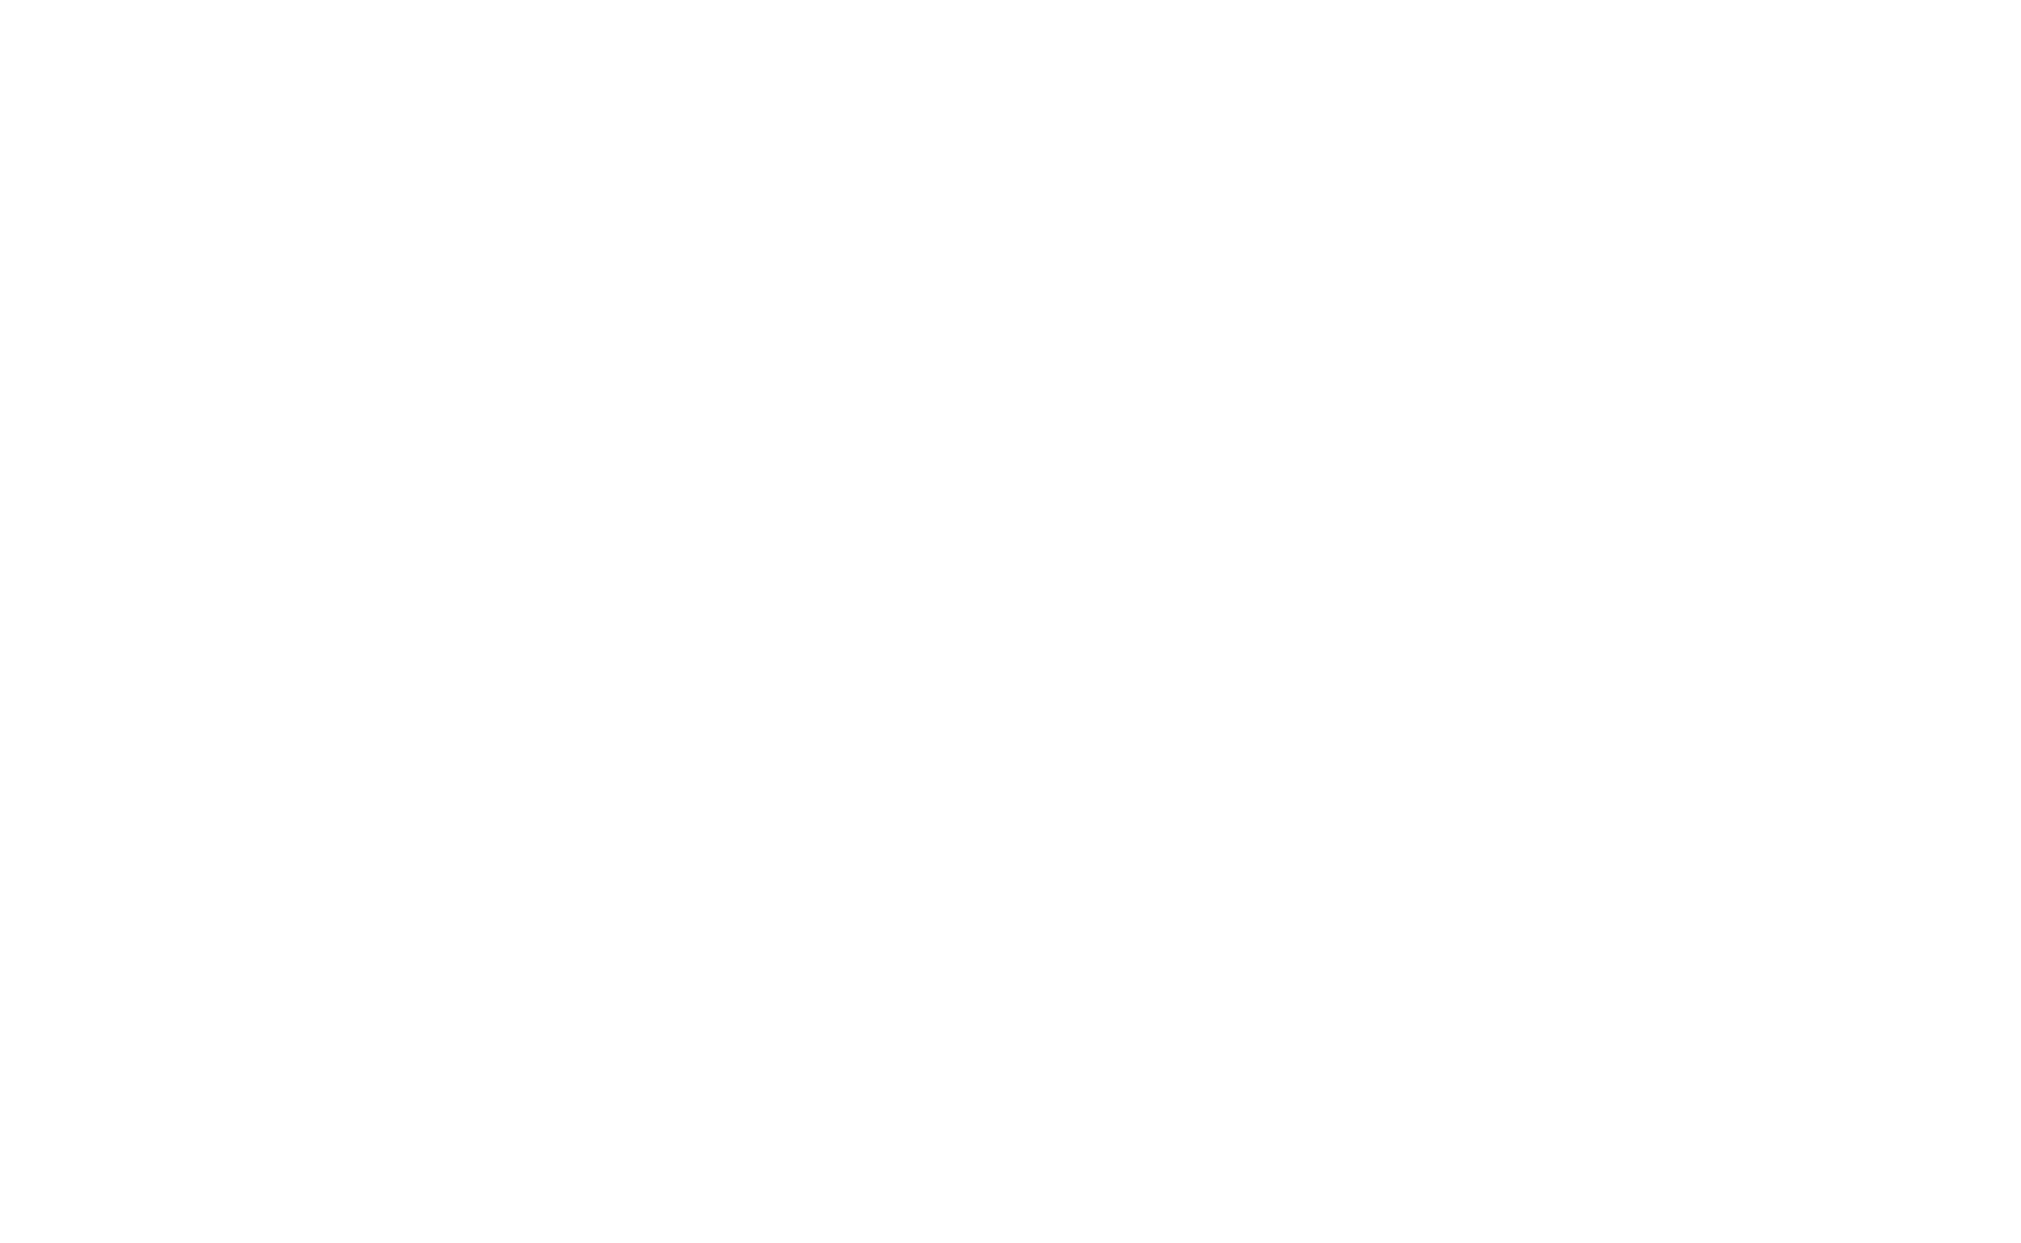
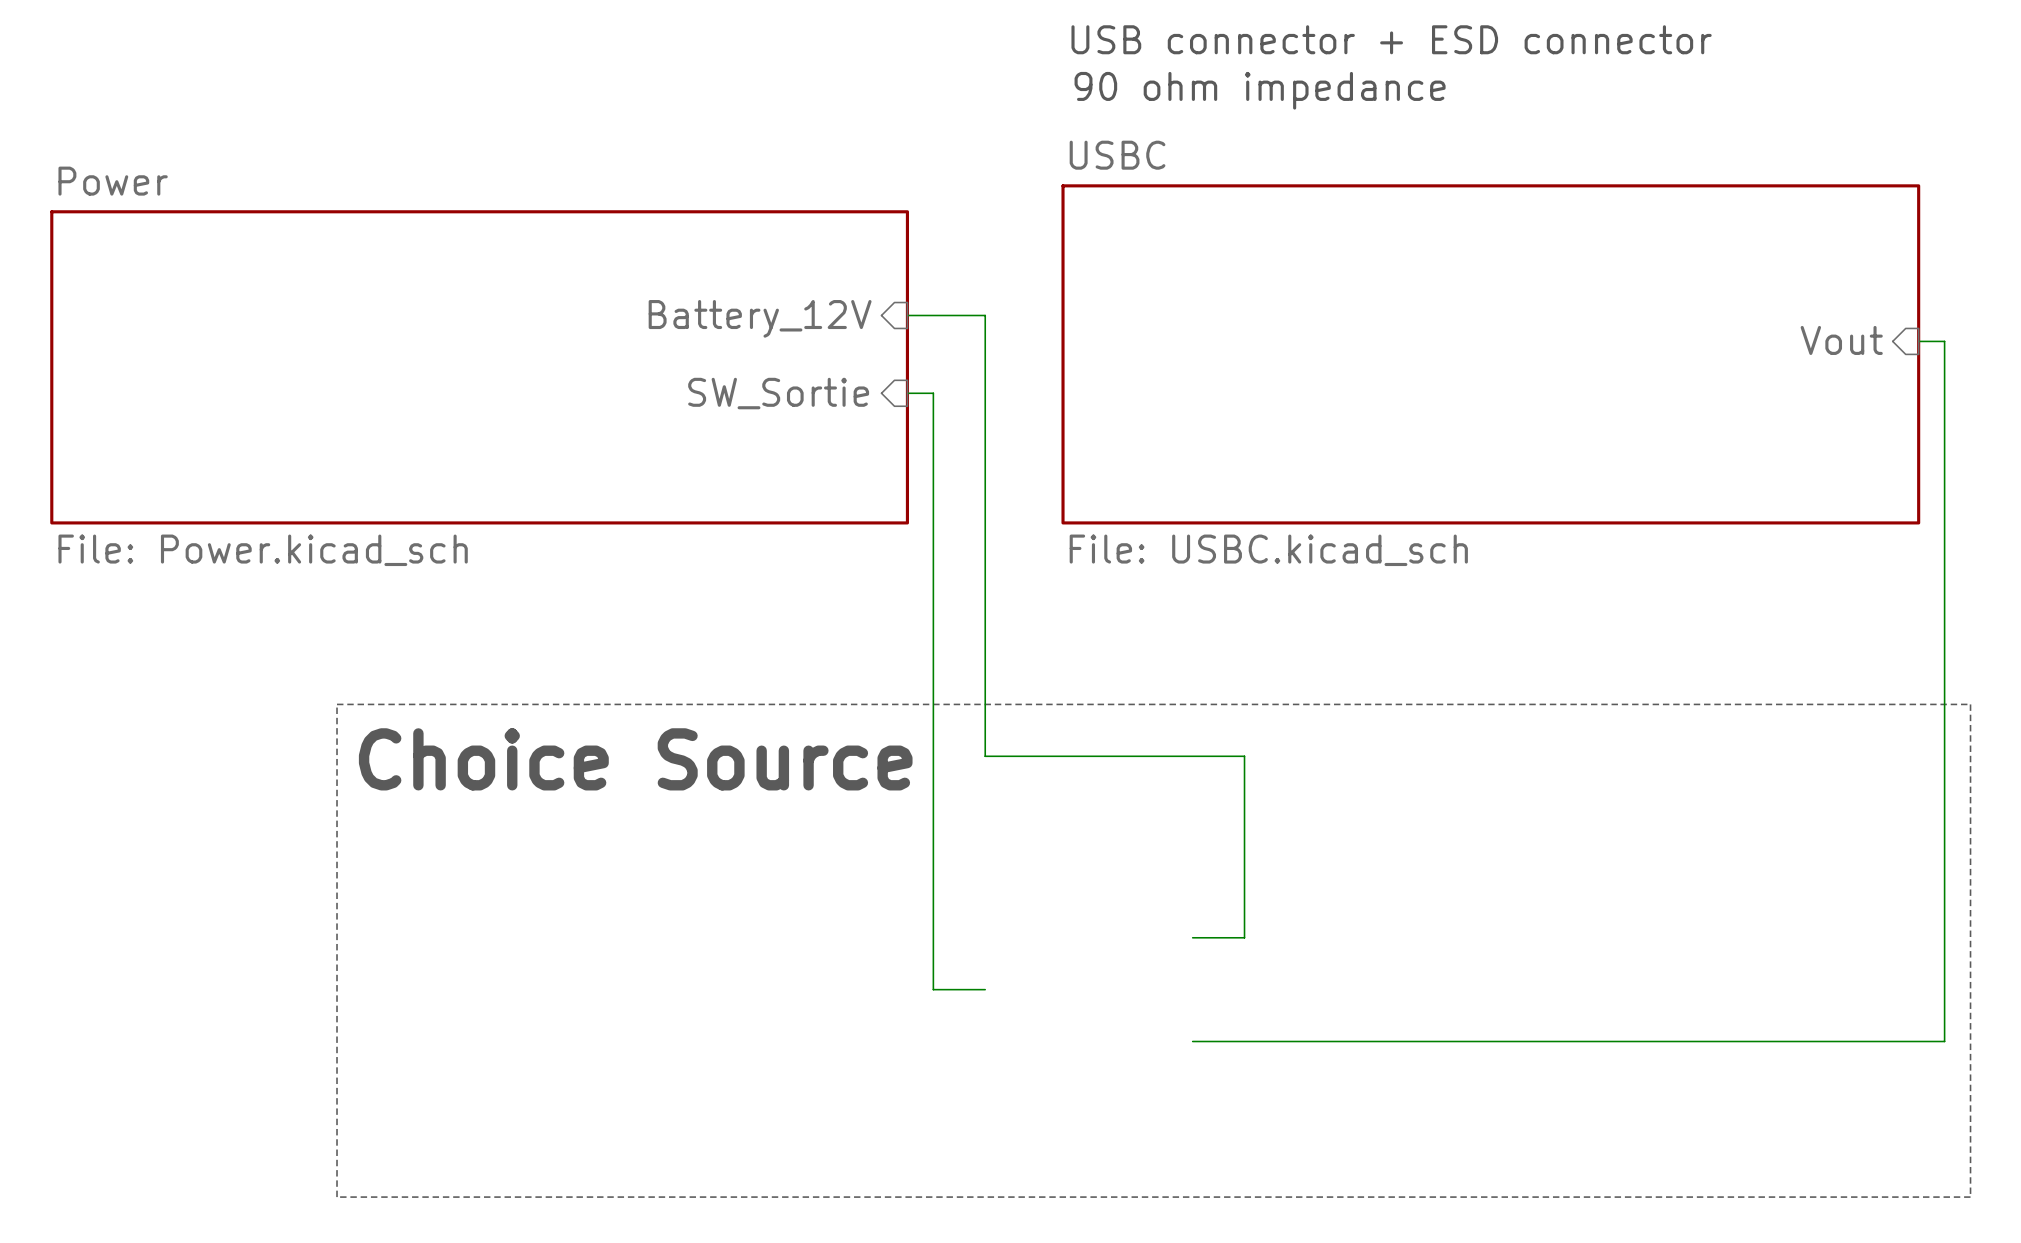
text: none -> USB connector + ESD connector (1391, 39)
text: none -> 90 ohm impedance (1260, 90)
wire: none -> (907, 315) (985, 315) (985, 756) (1244, 756) (1244, 937) (1192, 937)
sheet pin: none -> Battery_12V (760, 318)
sheet pin: none -> Vout (1841, 340)
wire: none -> (1918, 341) (1944, 341) (1944, 1041) (1192, 1041)
sheet USBC: none -> File: USBC.kicad_sch (1490, 354)
sheet Power: none -> File: Power.kicad_sch (479, 367)
sheet pin: none -> SW_Sortie (778, 393)
wire: none -> (907, 393) (933, 393) (933, 989) (985, 989)
line: none -> (337, 704) (1970, 704) (1970, 1197) (337, 1197) (337, 704)
text: none -> Choice Source (635, 759)

